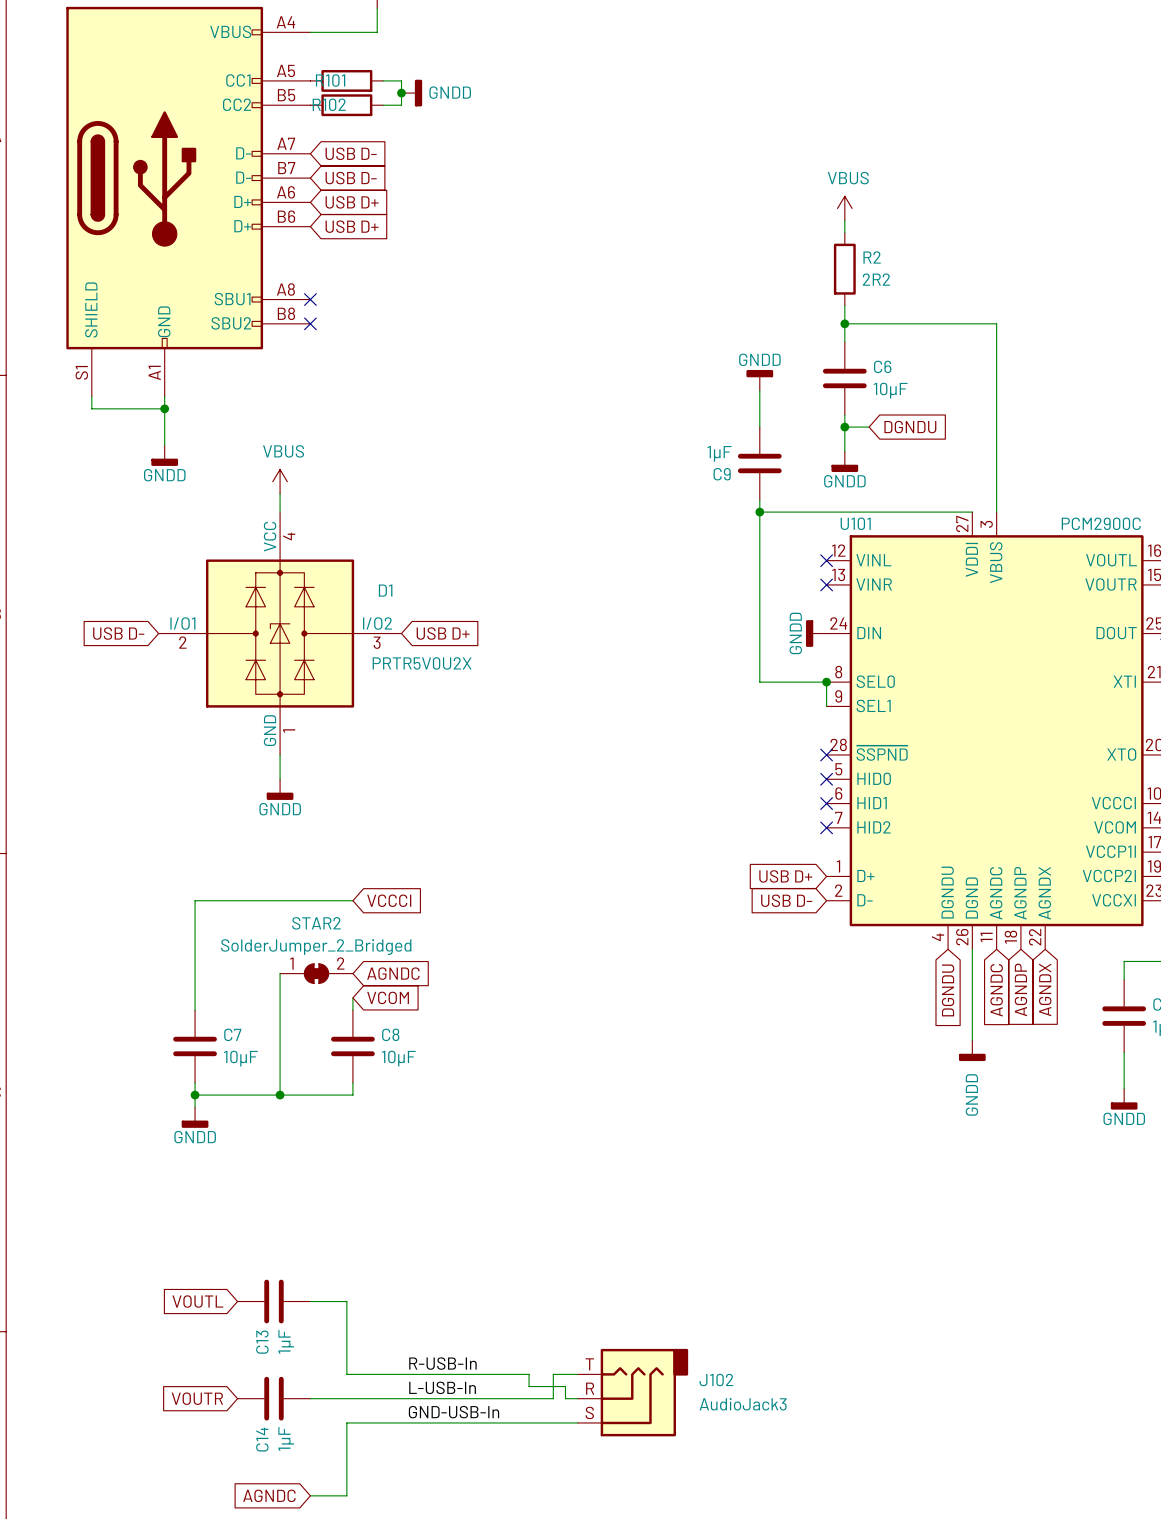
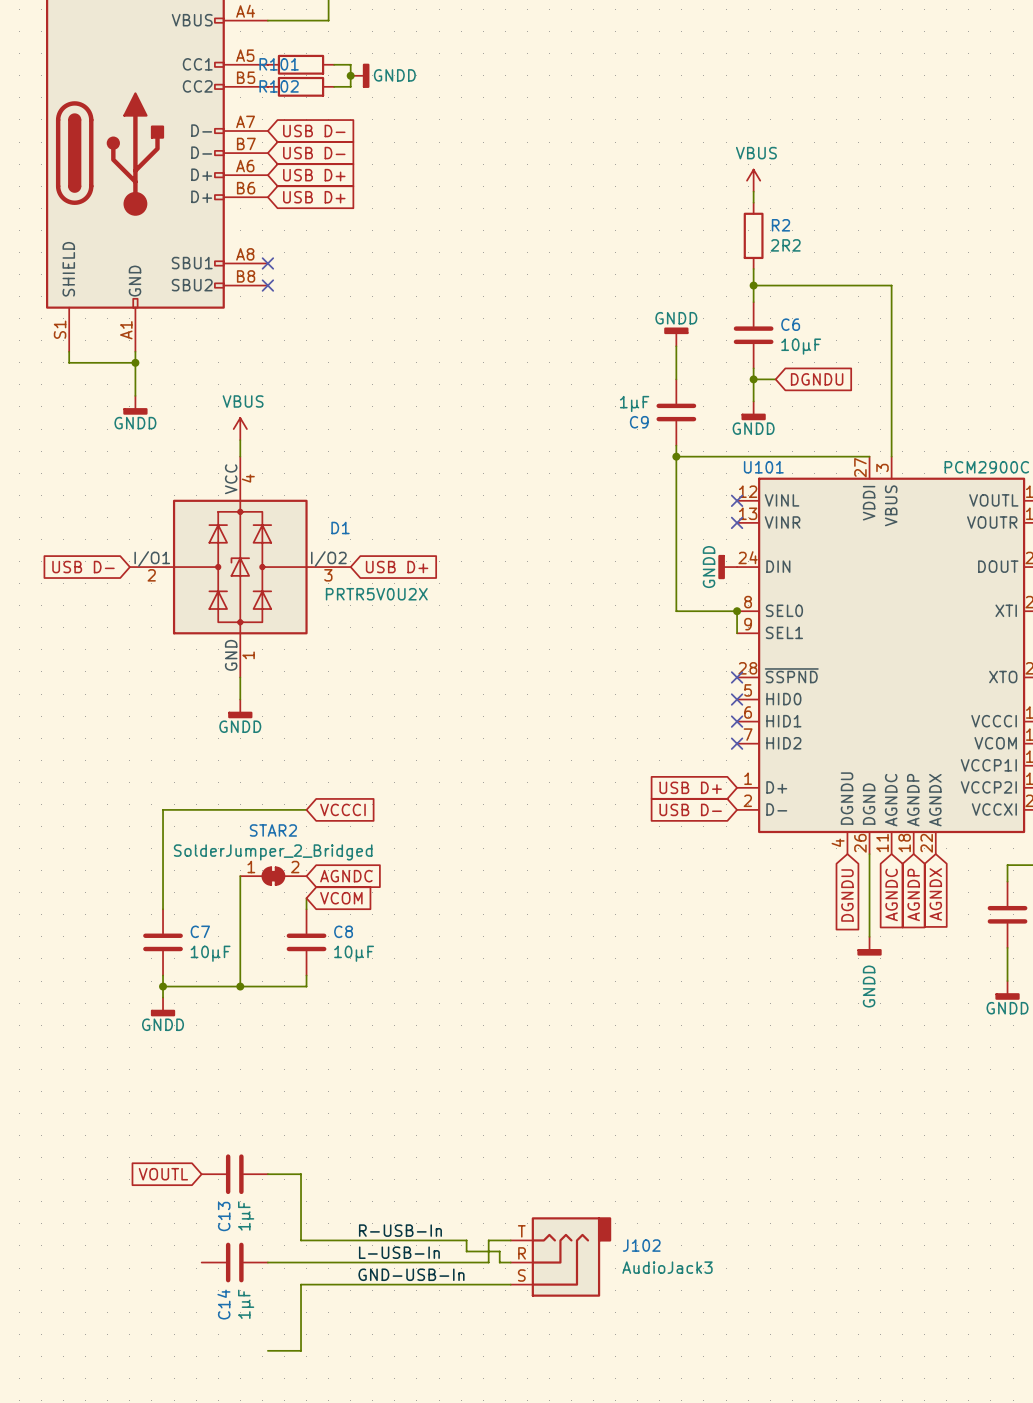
global label: VOUTR (197, 1398) -> none
global label: AGNDC (269, 1495) -> none

